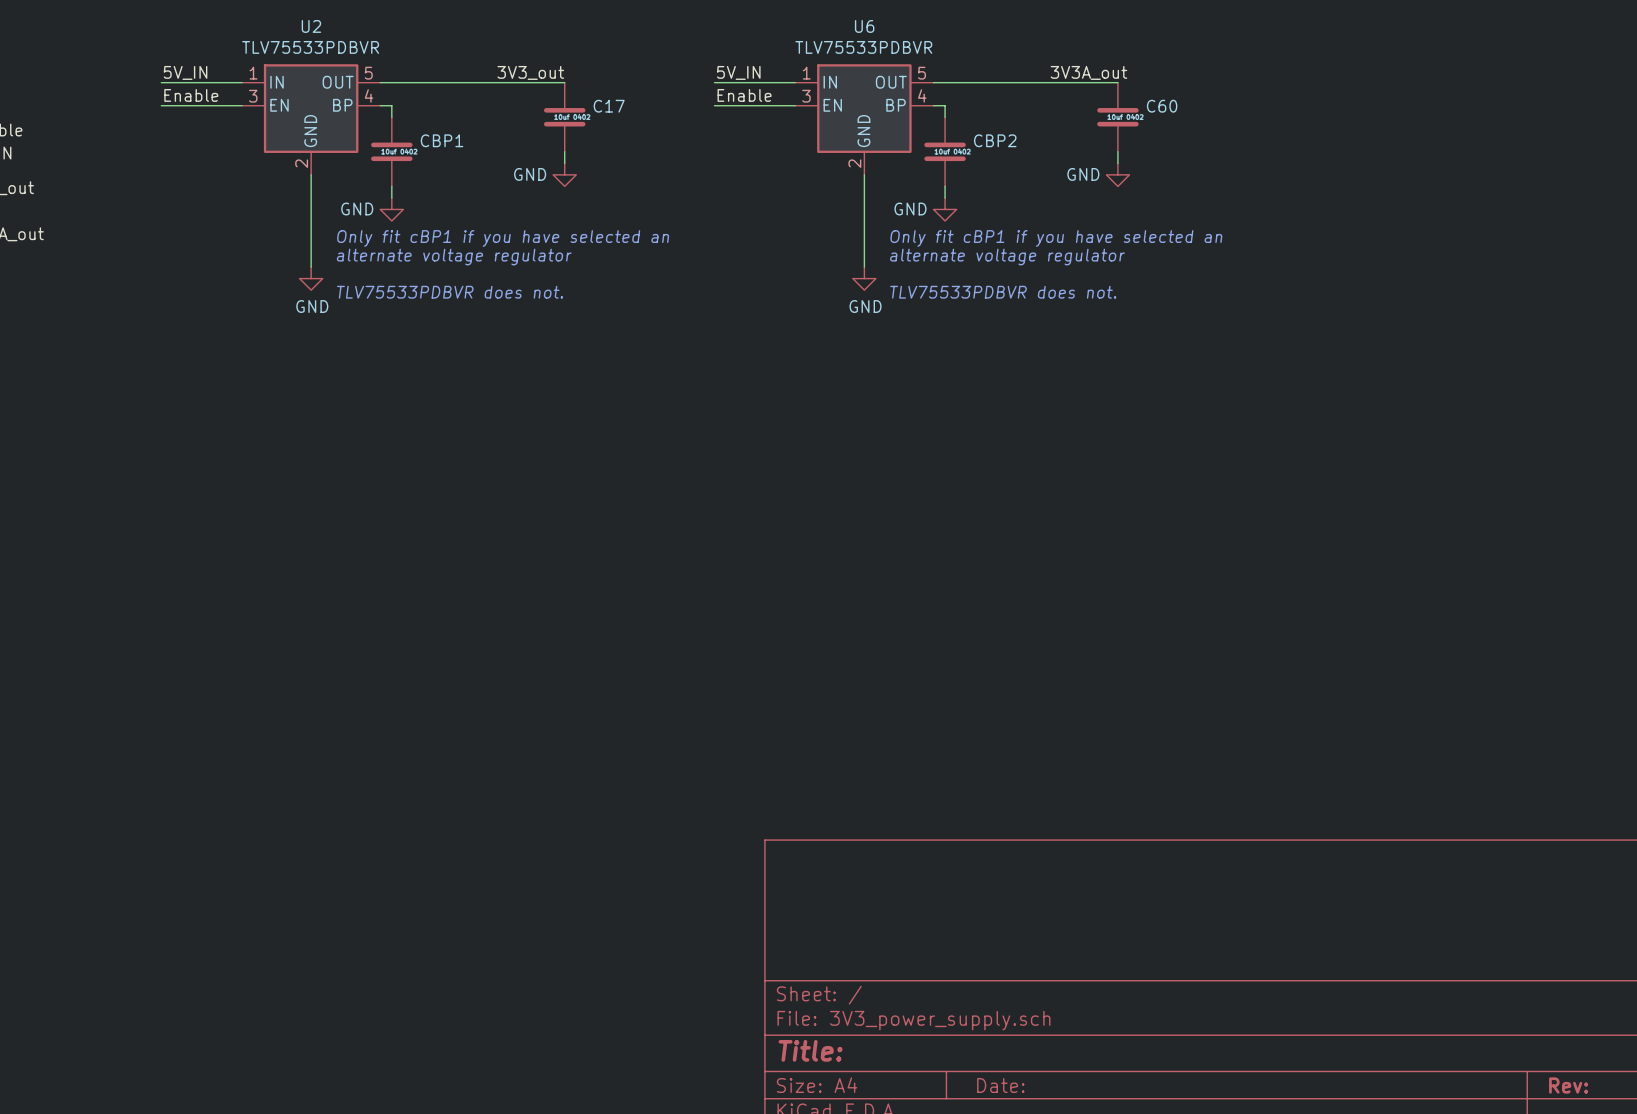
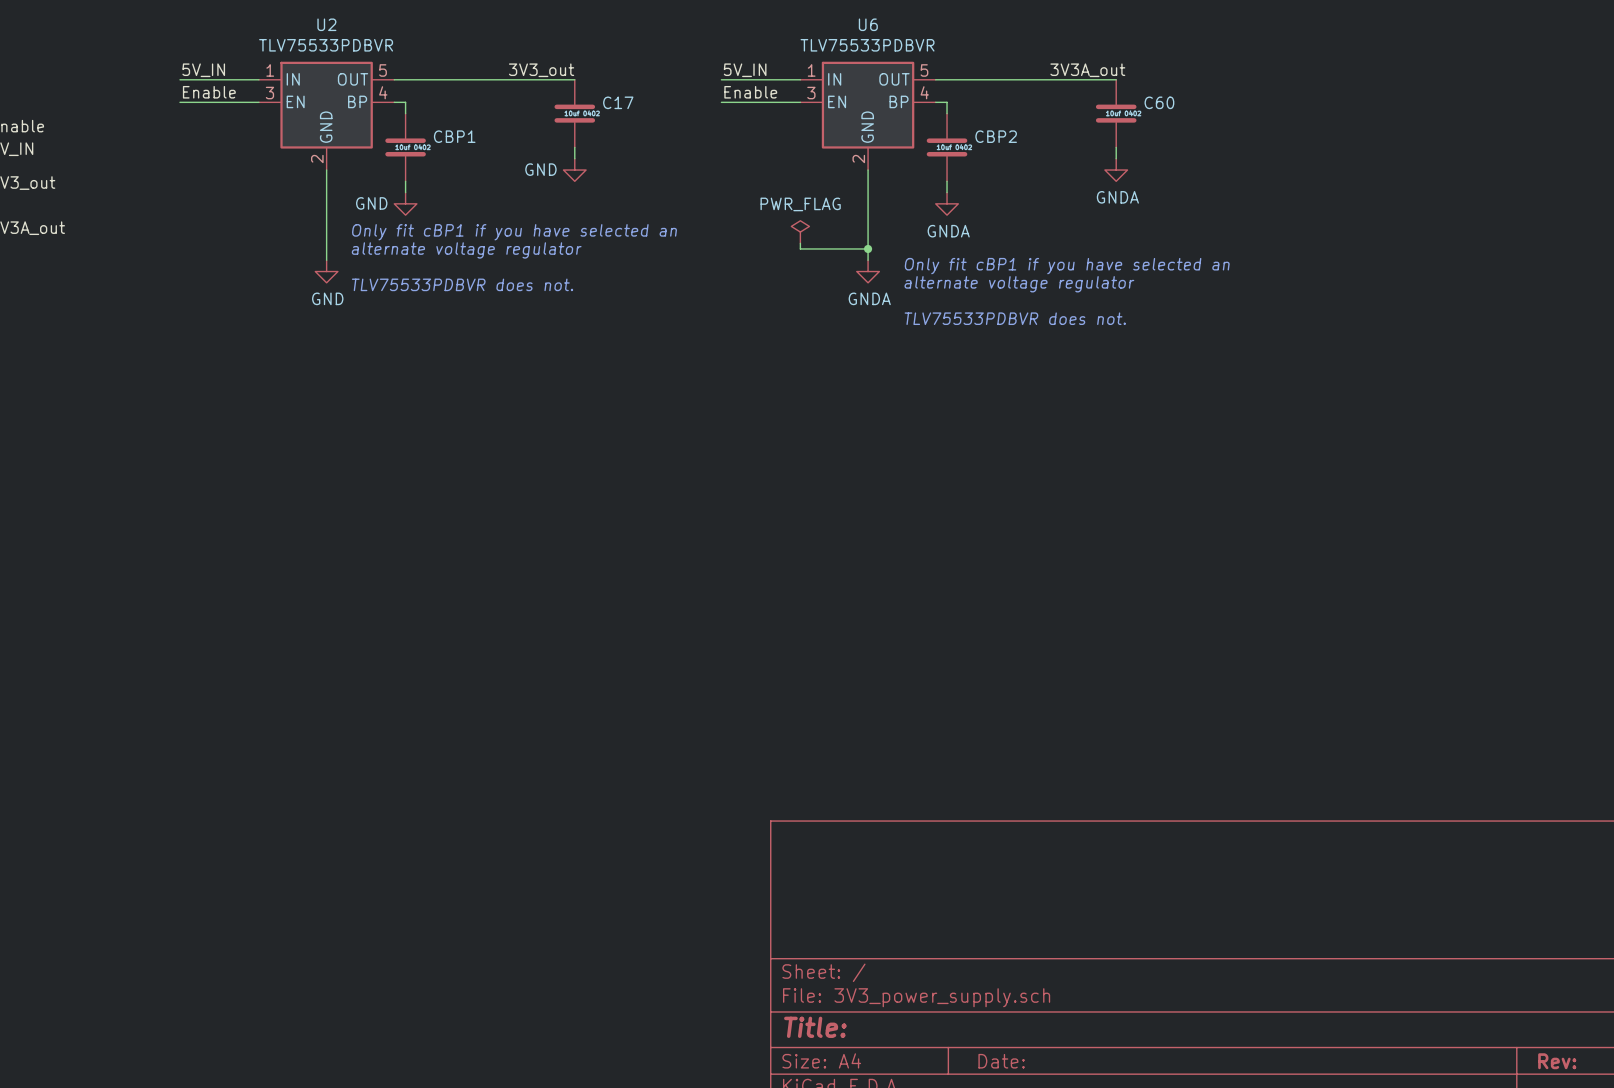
power symbol: GND (1117, 174) -> GNDA (1116, 170)
power symbol: GND (945, 209) -> GNDA (947, 203)
power symbol: none -> PWR_FLAG (800, 232)
text position: Only fit cBP1 if you have selected an (1056, 238) -> Only fit cBP1 if you have selected an (1067, 266)
wire: none -> (800, 243) (800, 248) (868, 248)
junction: none -> (868, 248)
text position: alternate voltage regulator (1007, 257) -> alternate voltage regulator (1019, 284)
power symbol: GND (864, 278) -> GNDA (868, 271)
text position: TLV75533PDBVR does not. (1003, 292) -> TLV75533PDBVR does not. (1015, 318)

